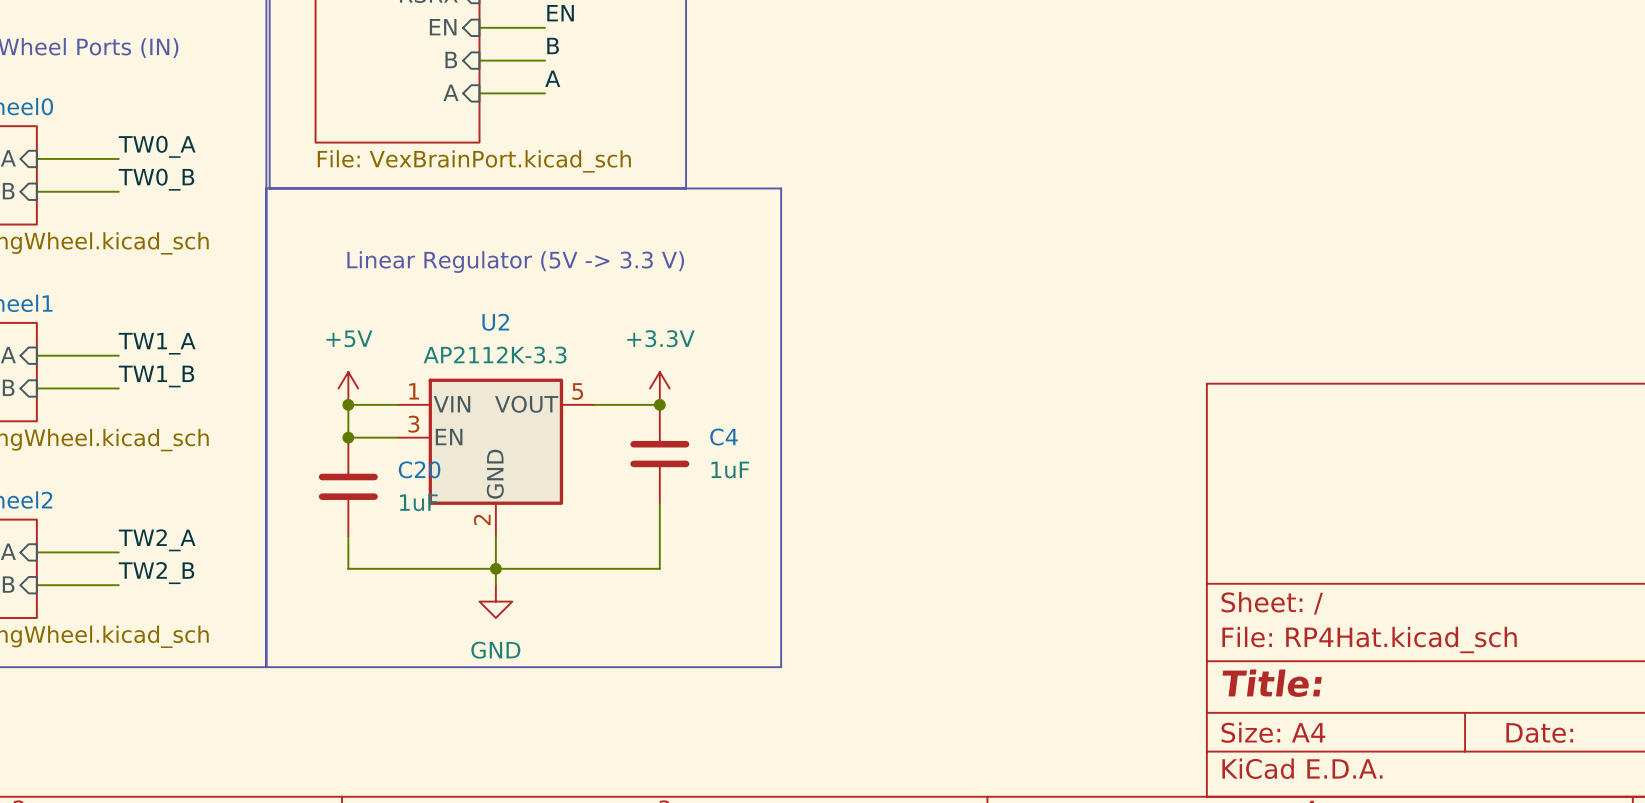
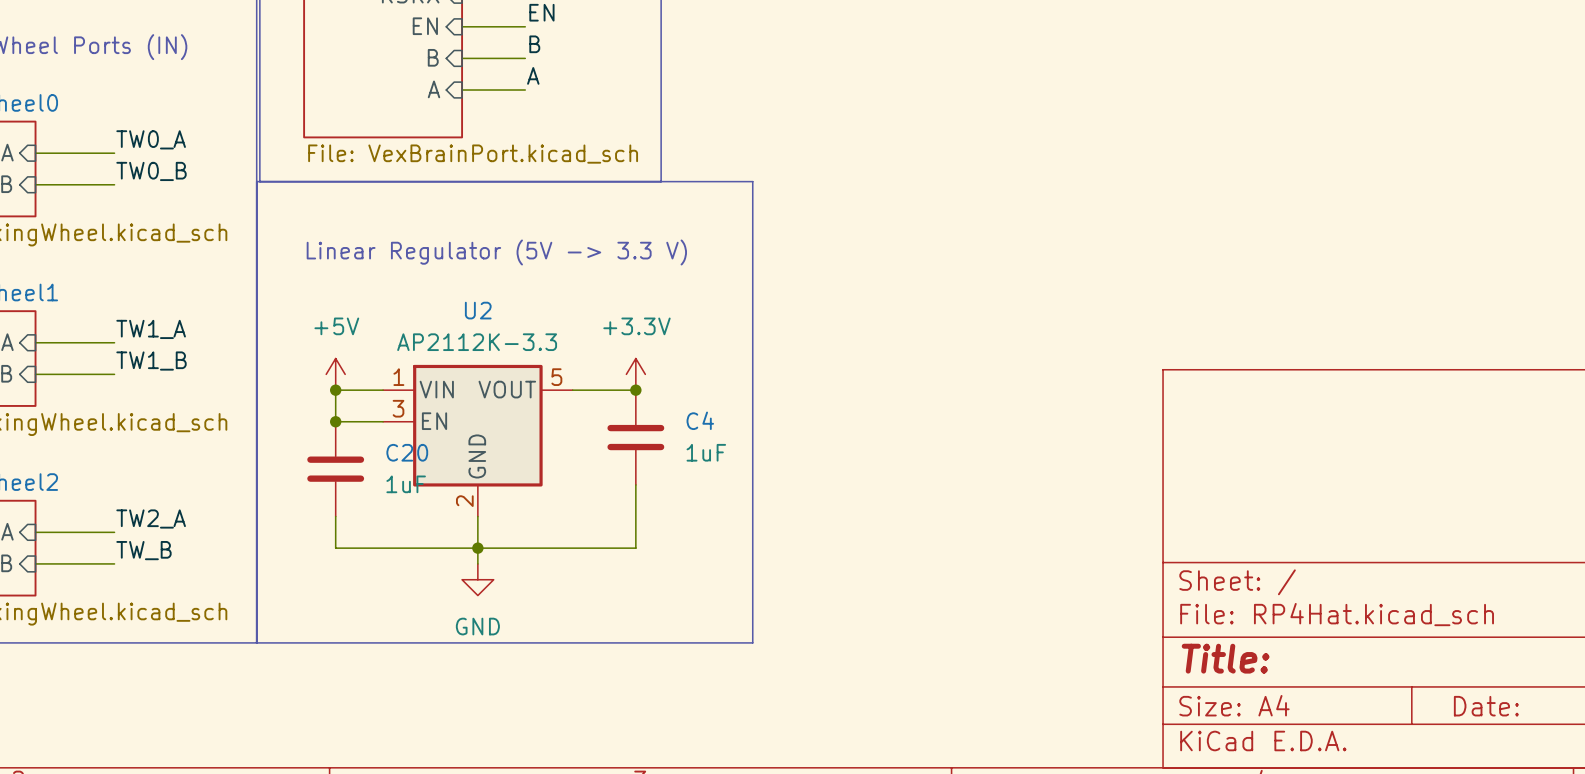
label: TW2_B (156, 573) -> TW_B (143, 550)

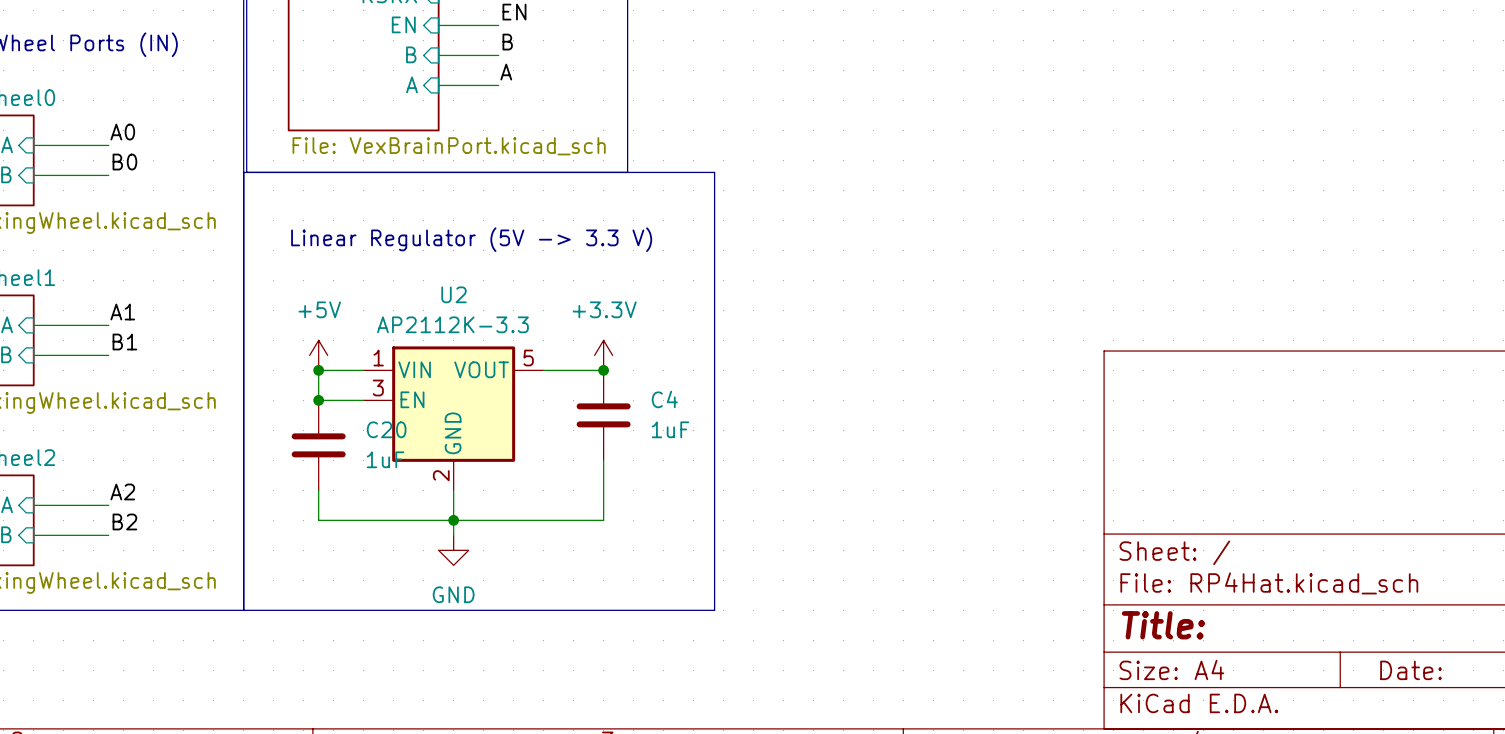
label: TW0_A (151, 139) -> A0 (122, 132)
label: TW0_B (151, 171) -> B0 (124, 162)
label: TW1_A (151, 329) -> A1 (122, 312)
label: TW1_B (151, 361) -> B1 (124, 342)
label: TW2_A (151, 519) -> A2 (122, 491)
label: TW_B (143, 550) -> B2 (124, 521)

